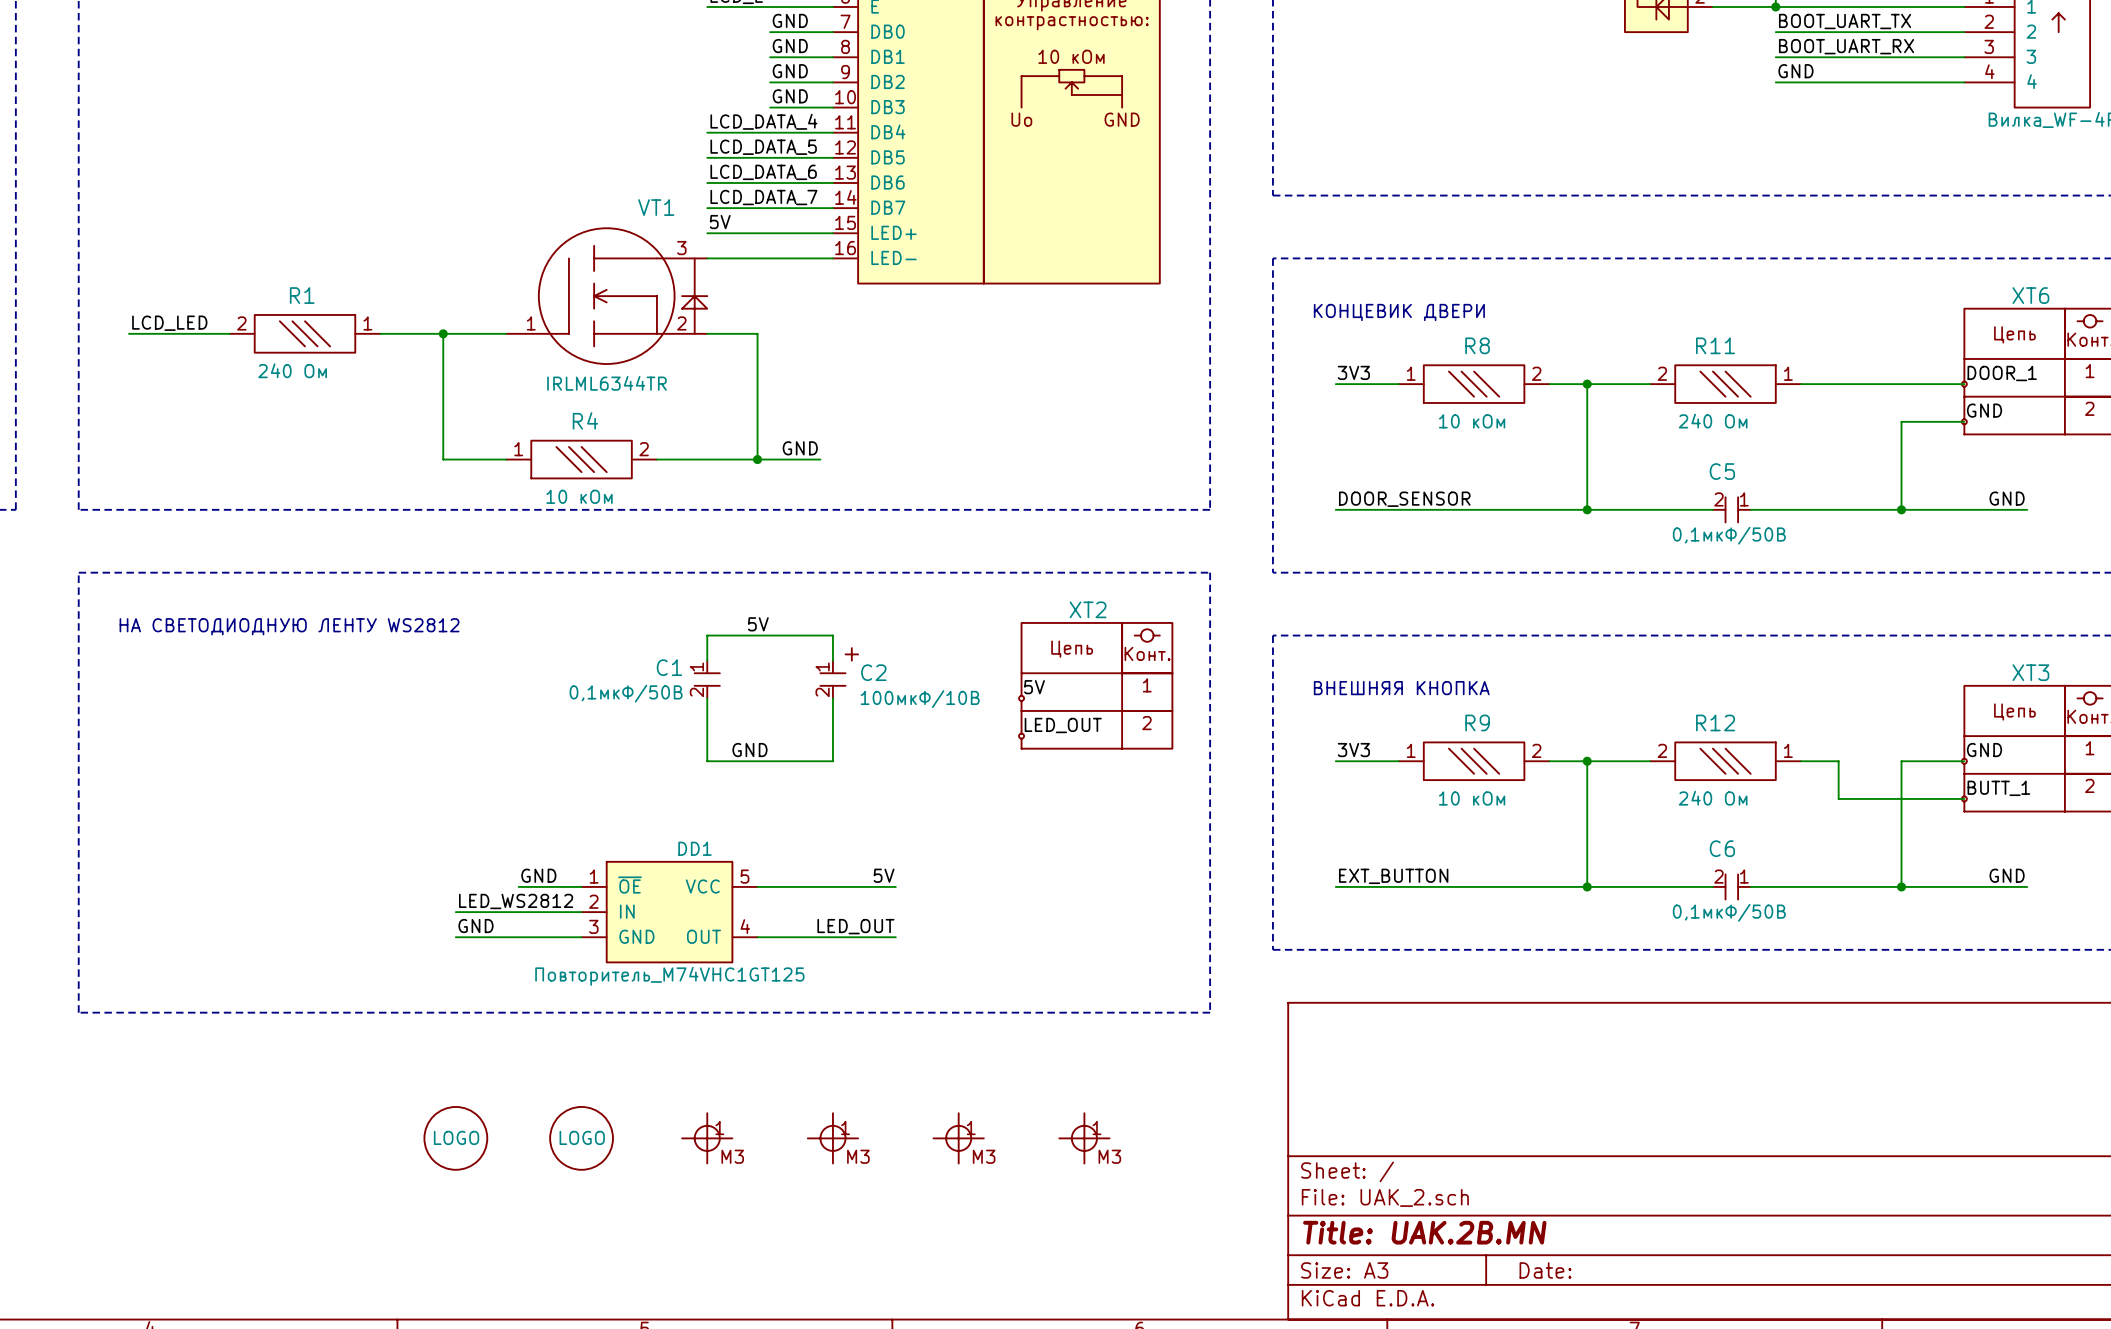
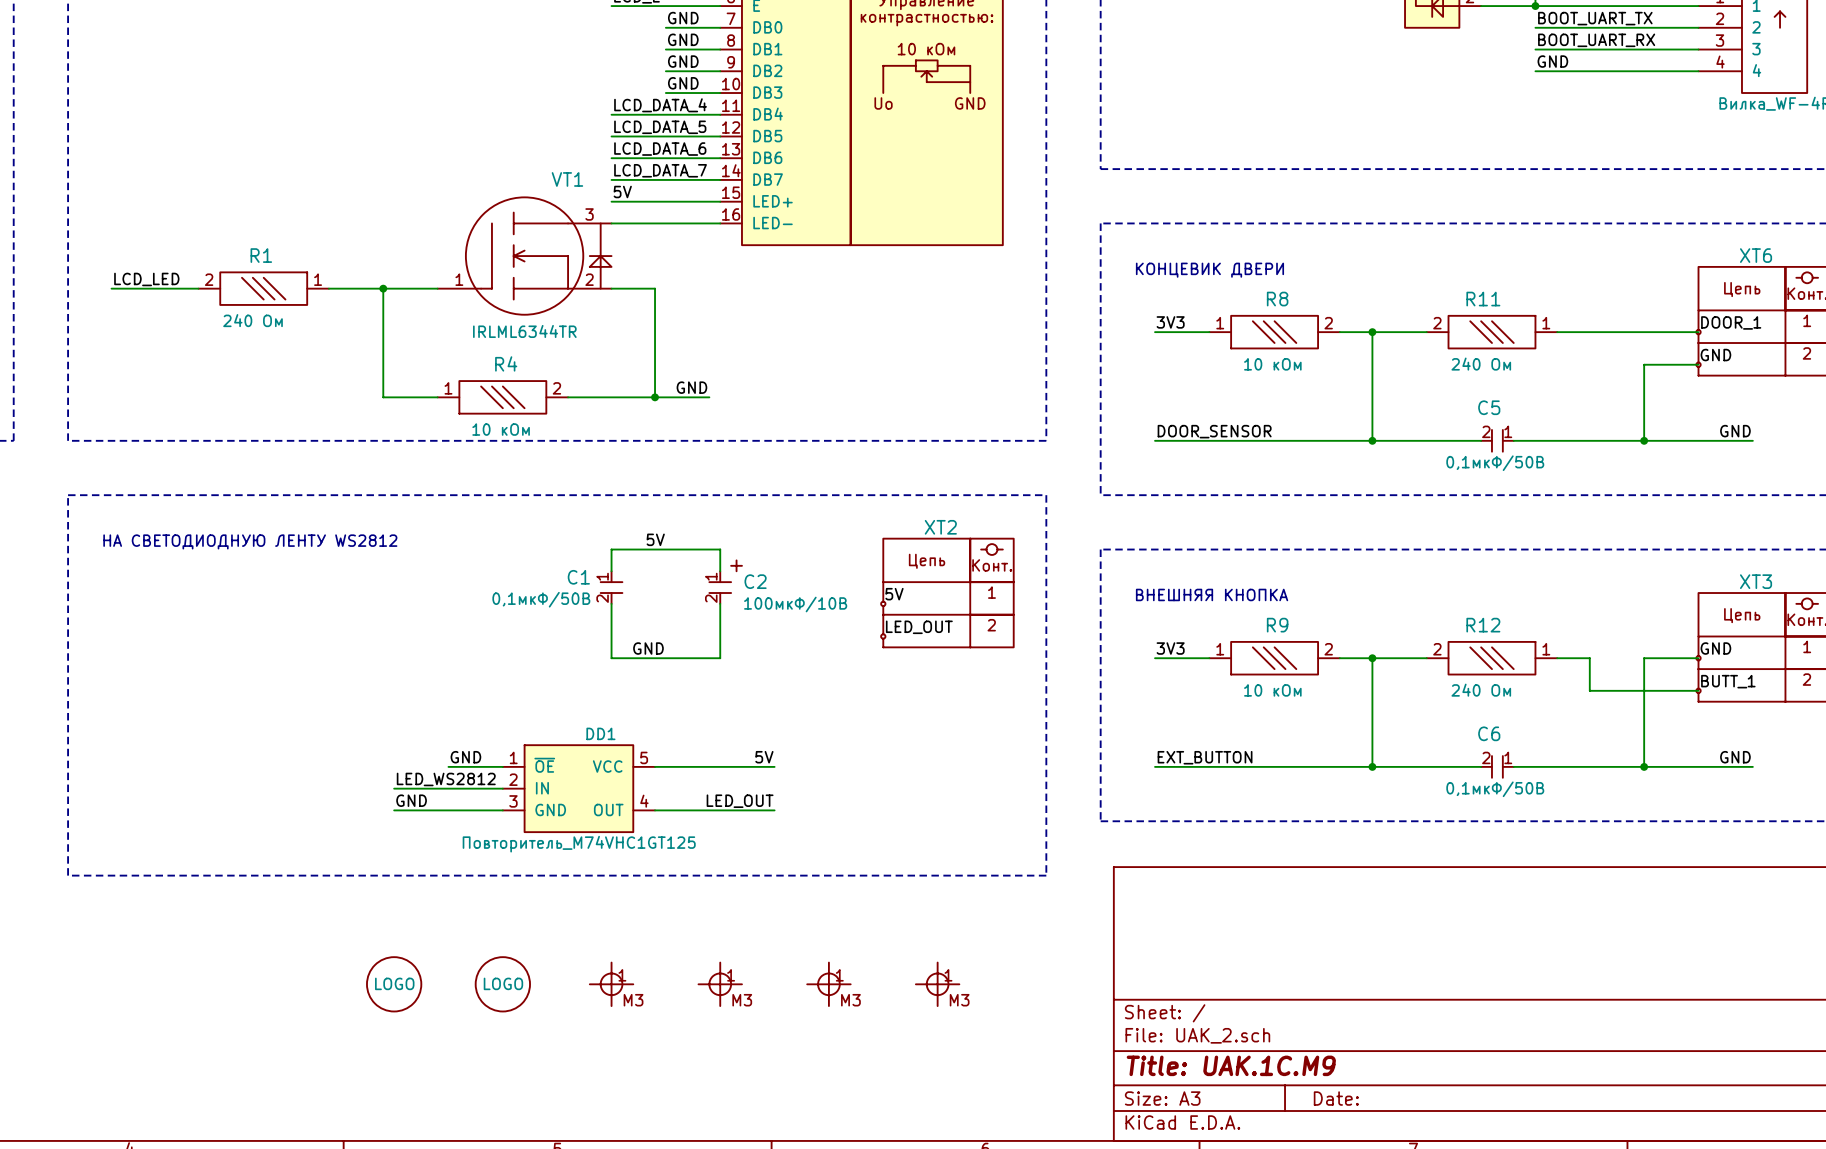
title block: Title: UAK.2B.MN (1424, 1232) -> Title: UAK.1C.M9 (1231, 1065)

